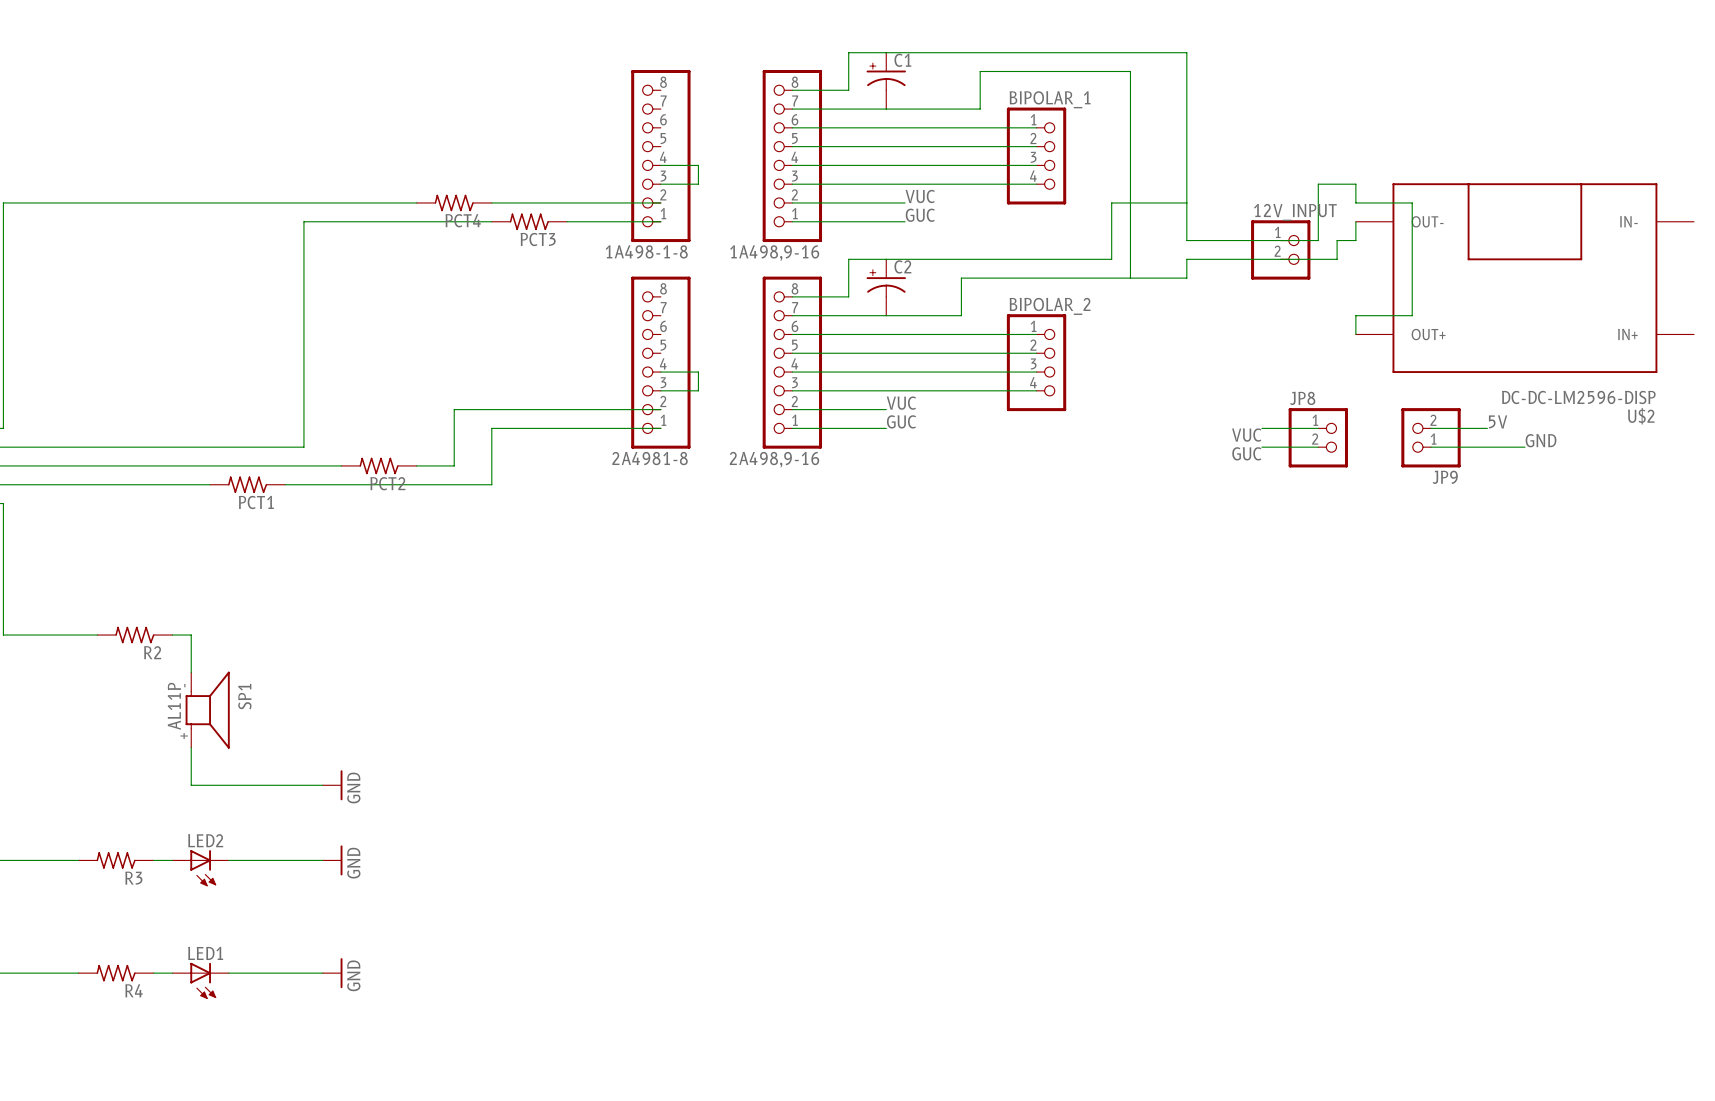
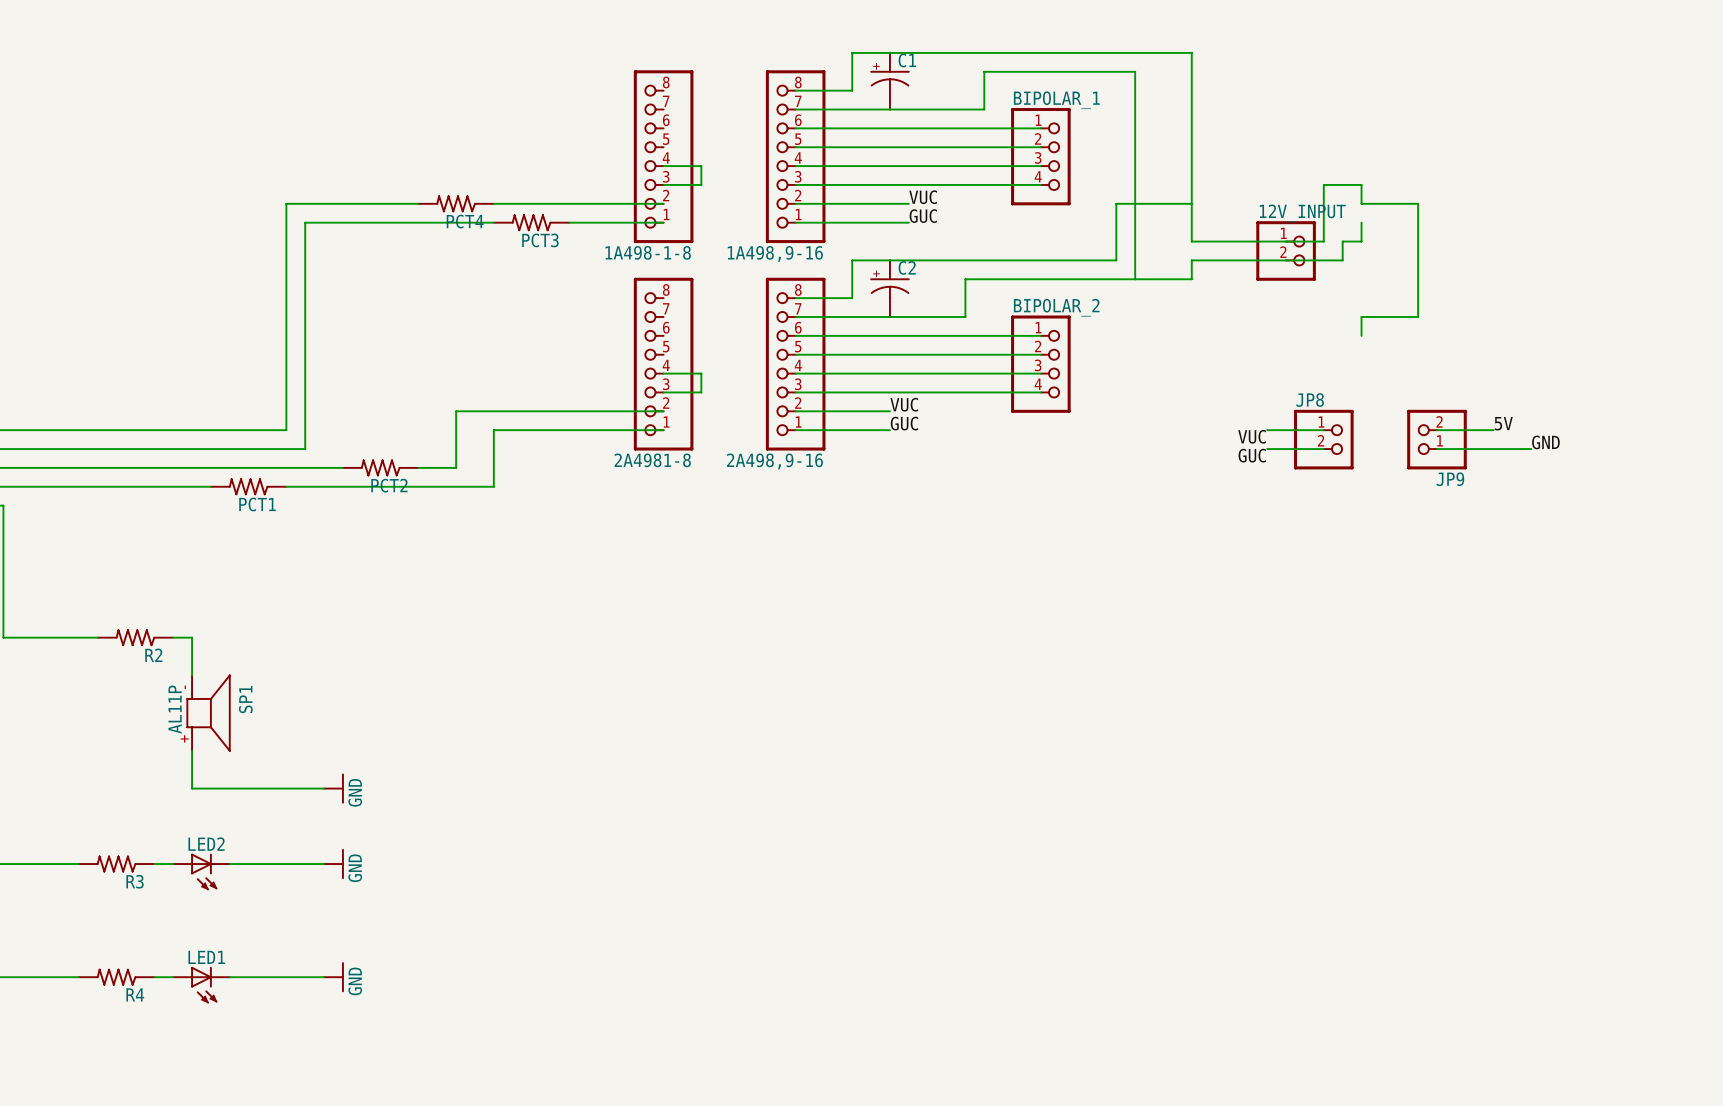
wire: (285, 202) (3, 202) (3, 428) -> (286, 203) (286, 430) (3, 430)
U$2: DC-DC-LM2596-DISP (1524, 278) -> none

